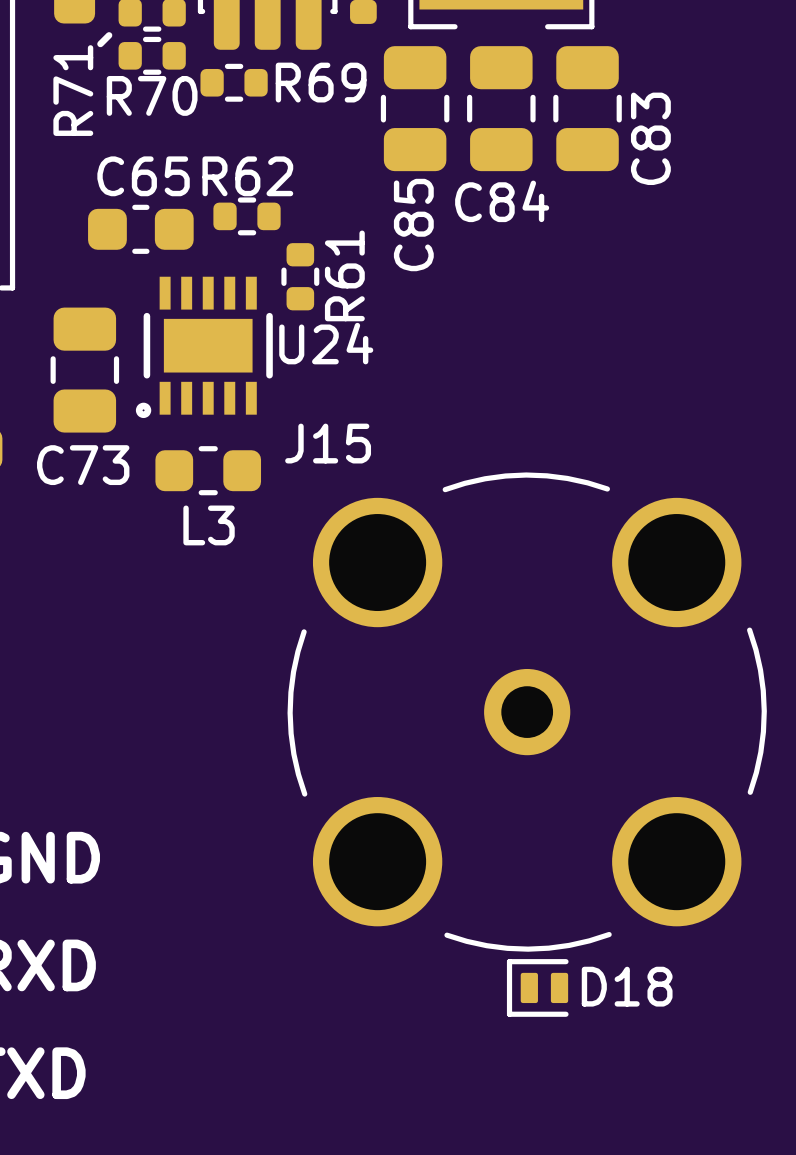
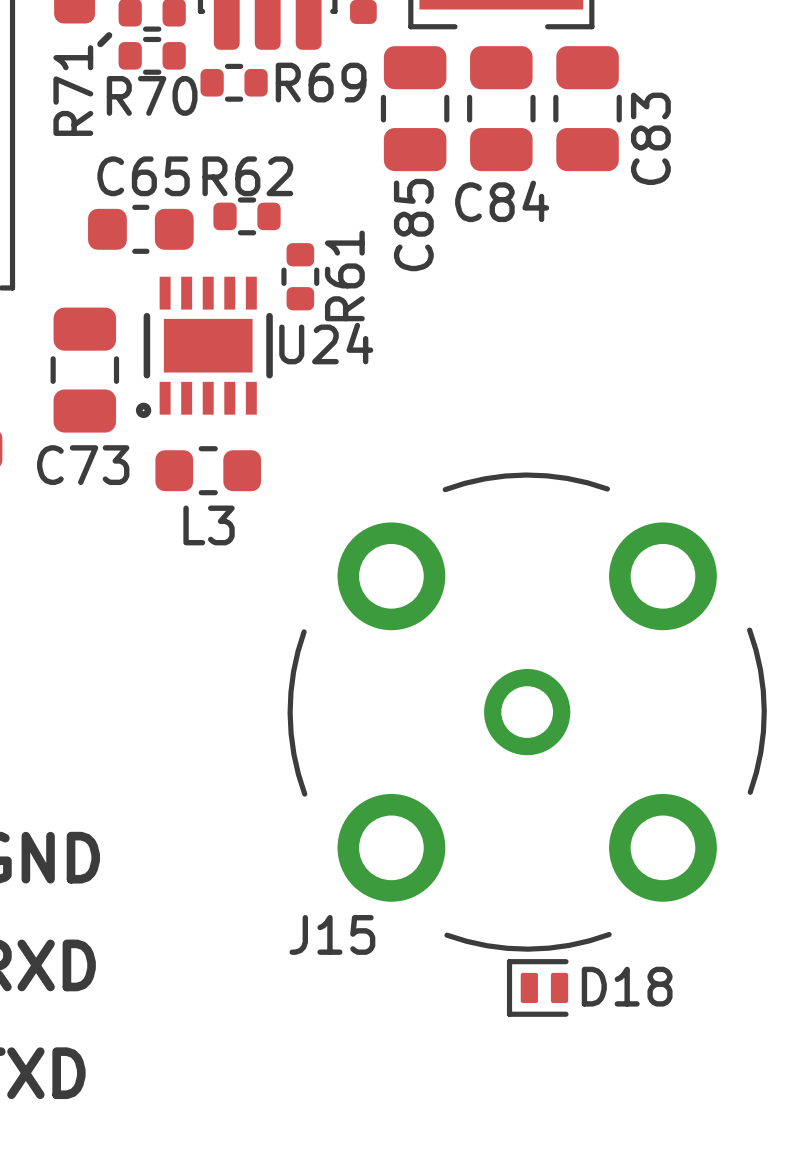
J15 name position: J15 (328, 443) -> J15 (332, 934)
J15 footprint: [287, 472, 767, 952] -> [287, 472, 767, 952]

